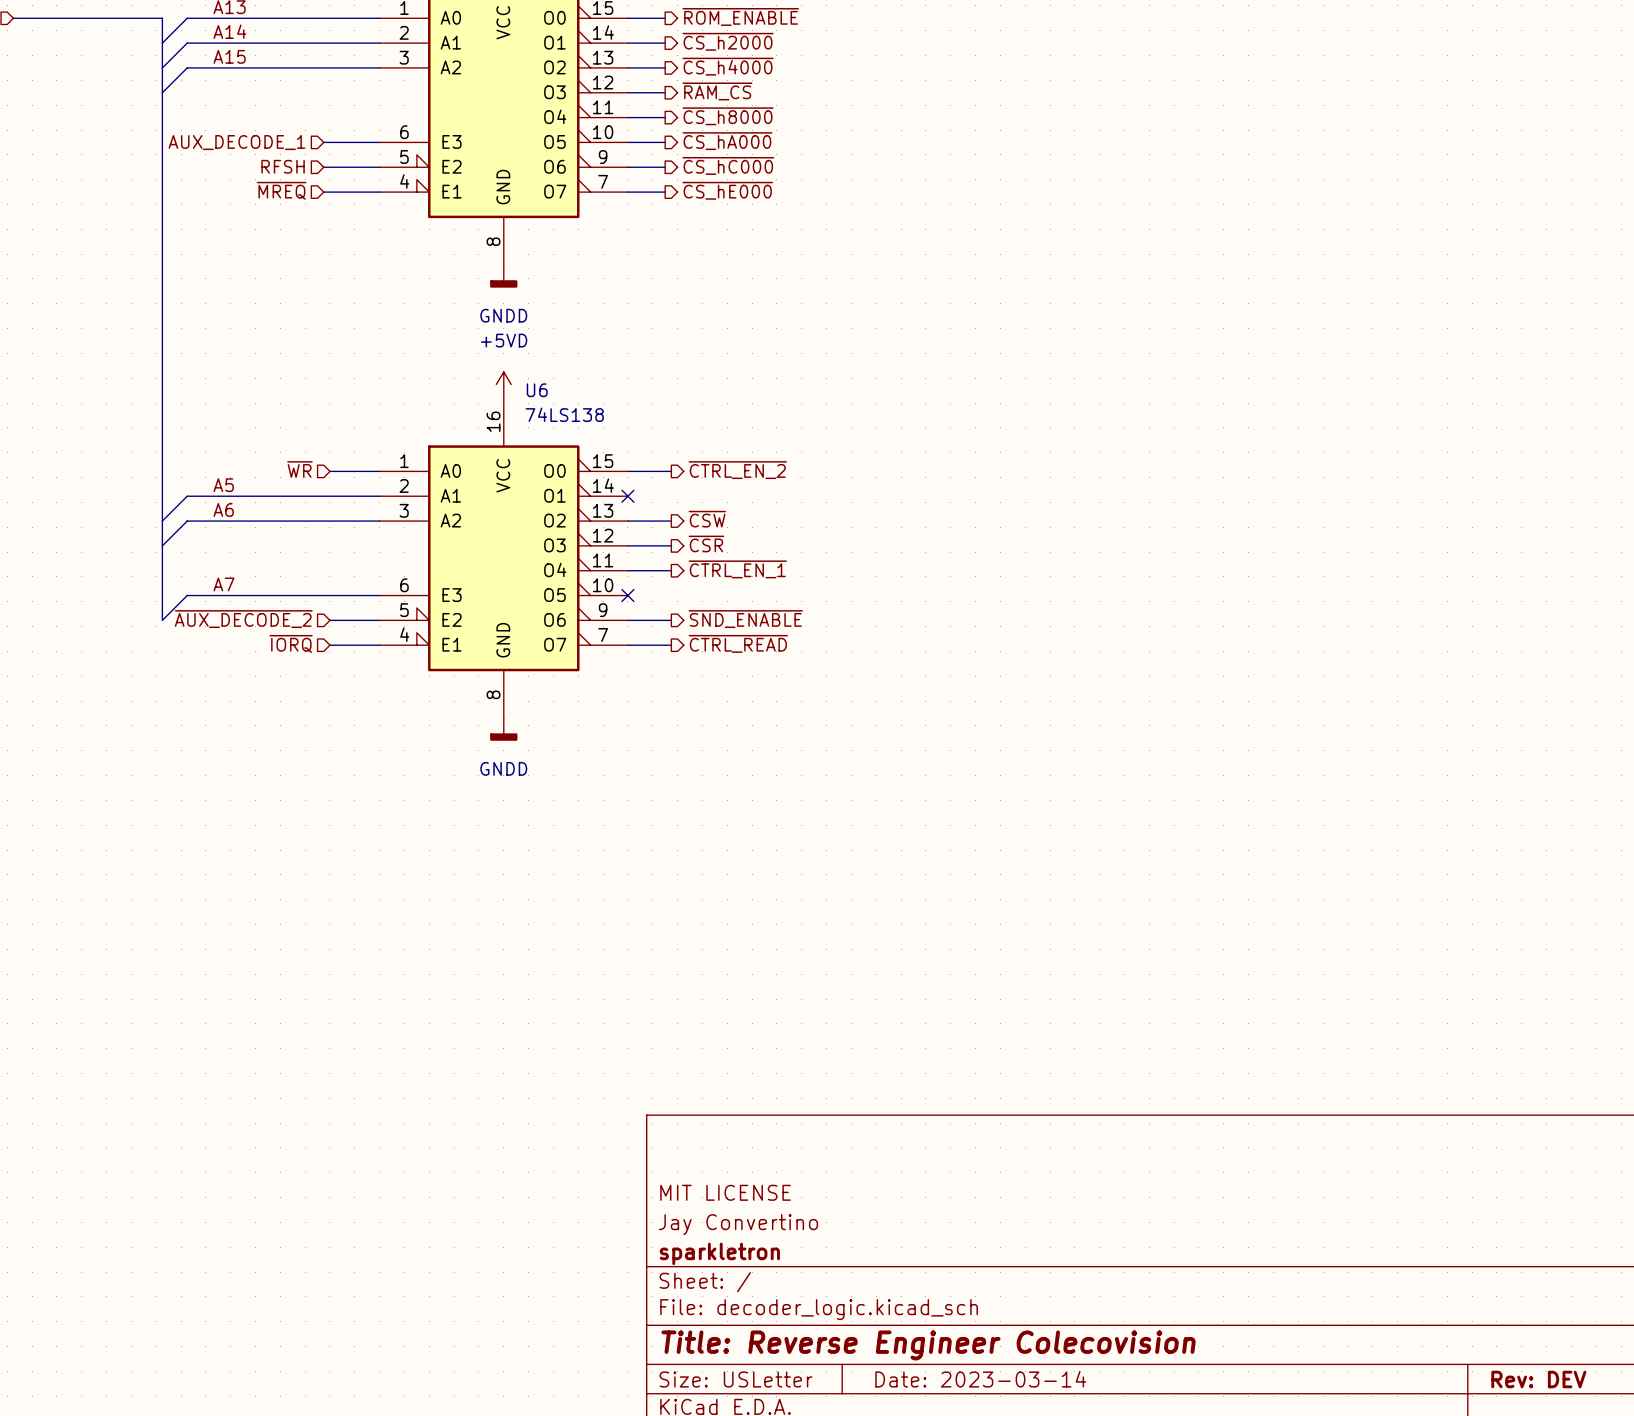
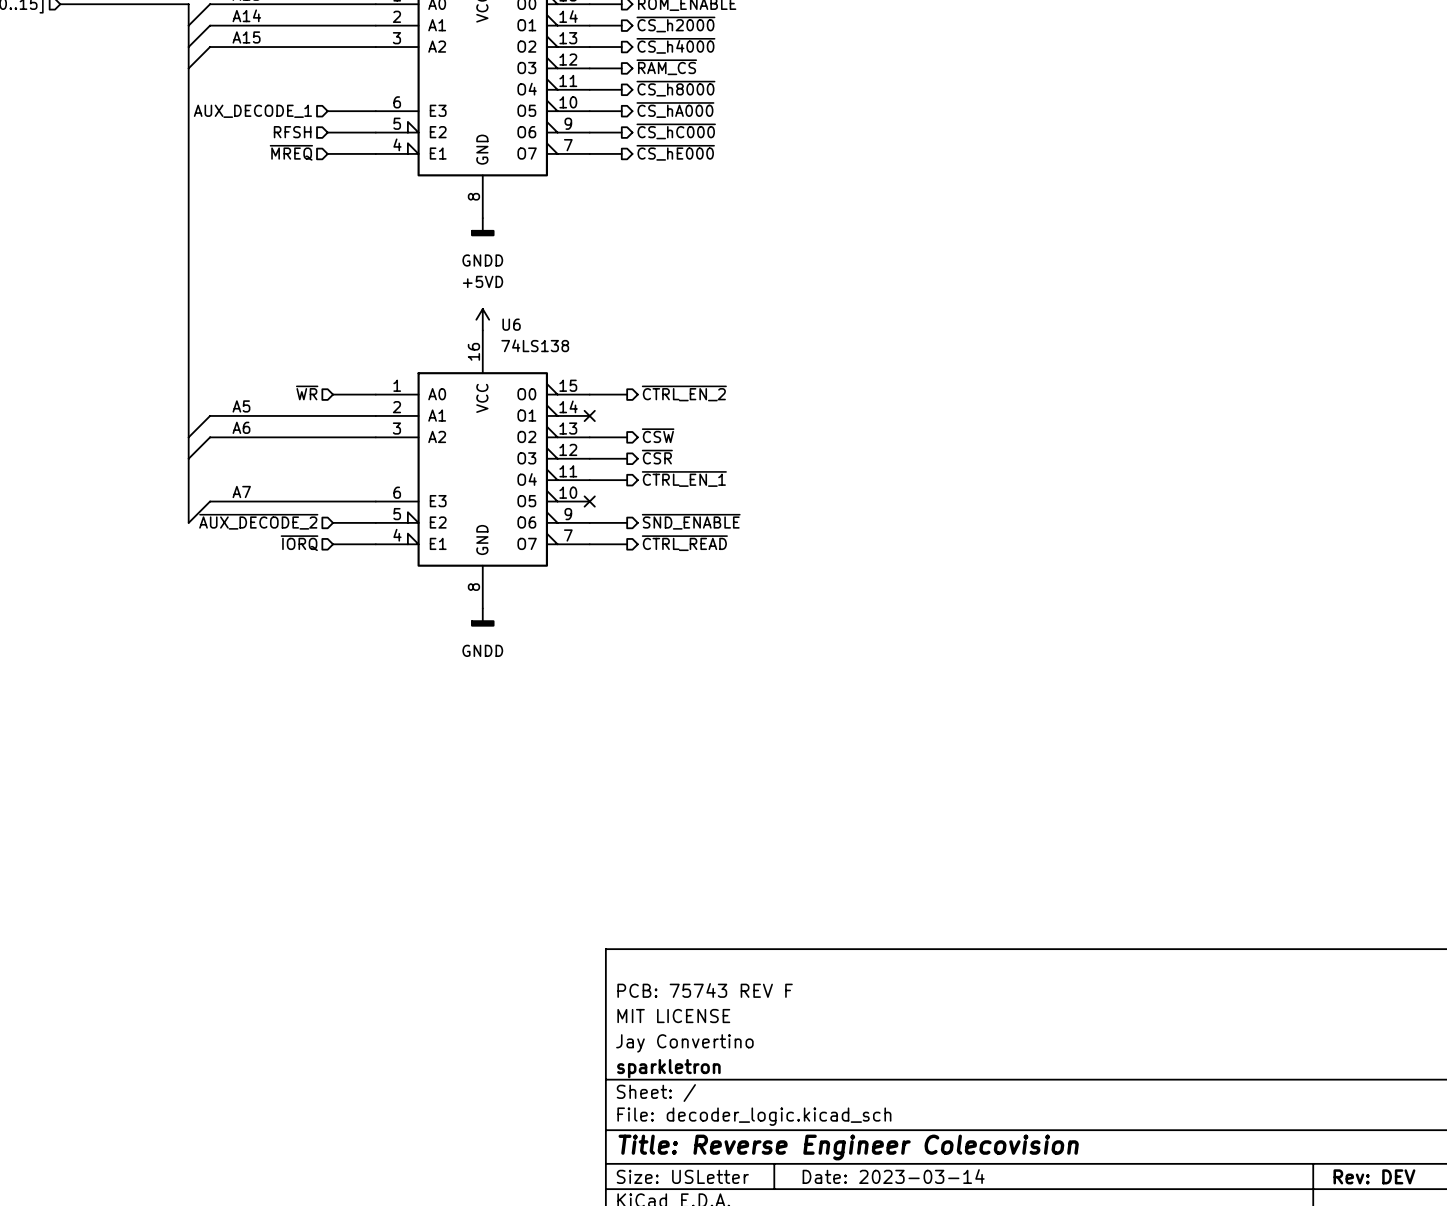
title block: none -> PCB: 75743 REV F (705, 990)

